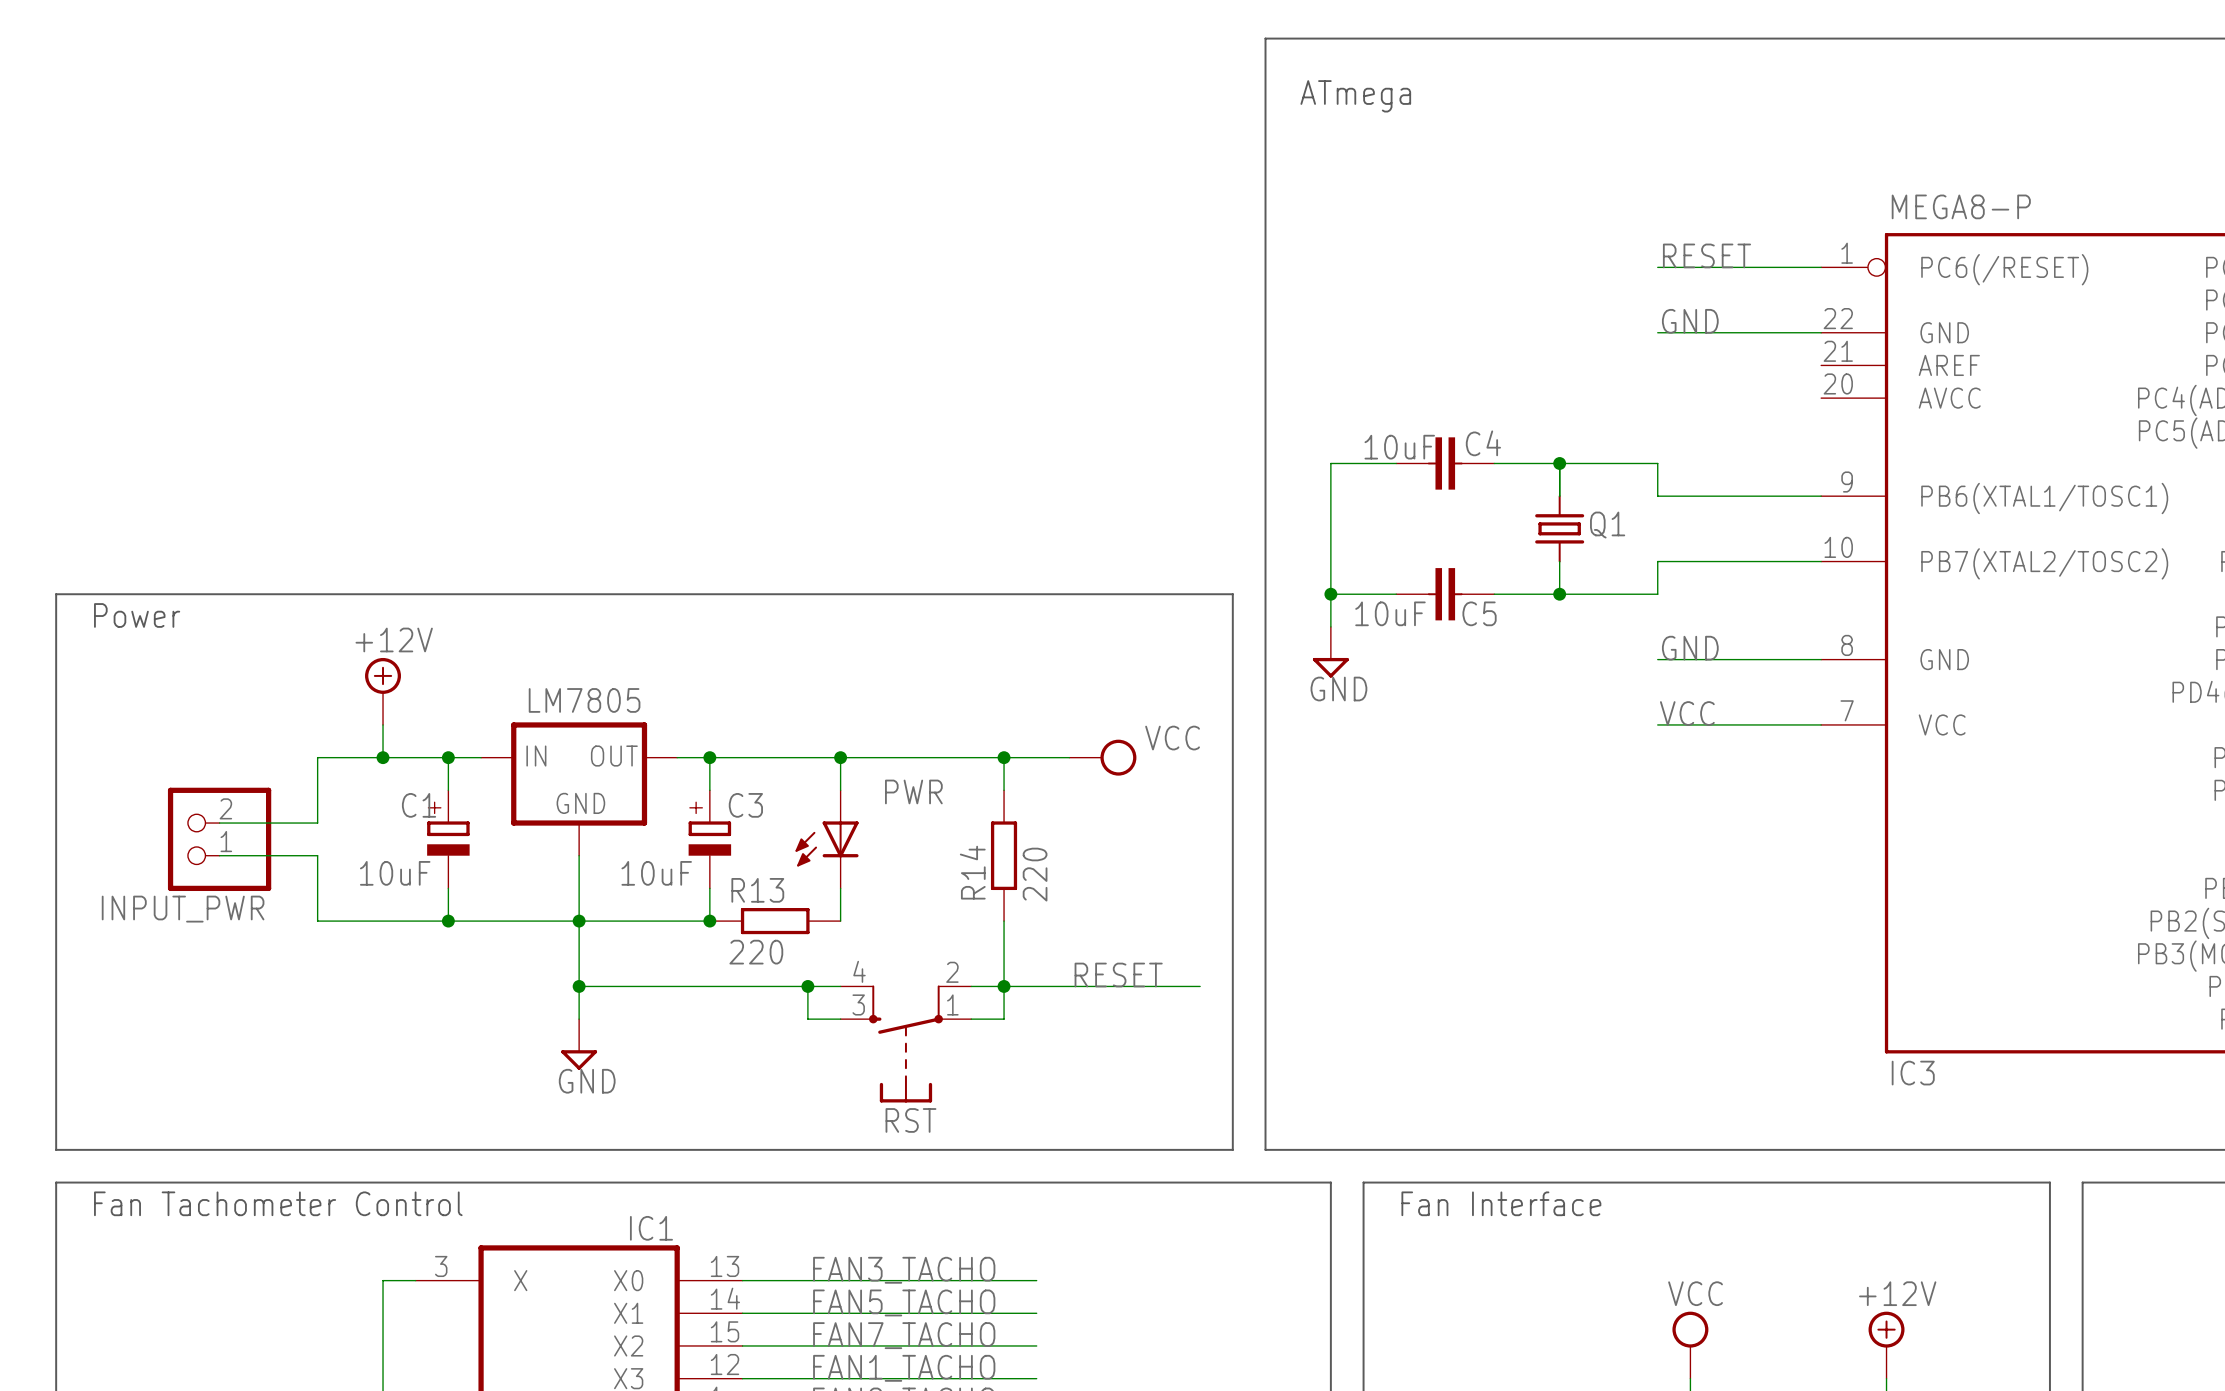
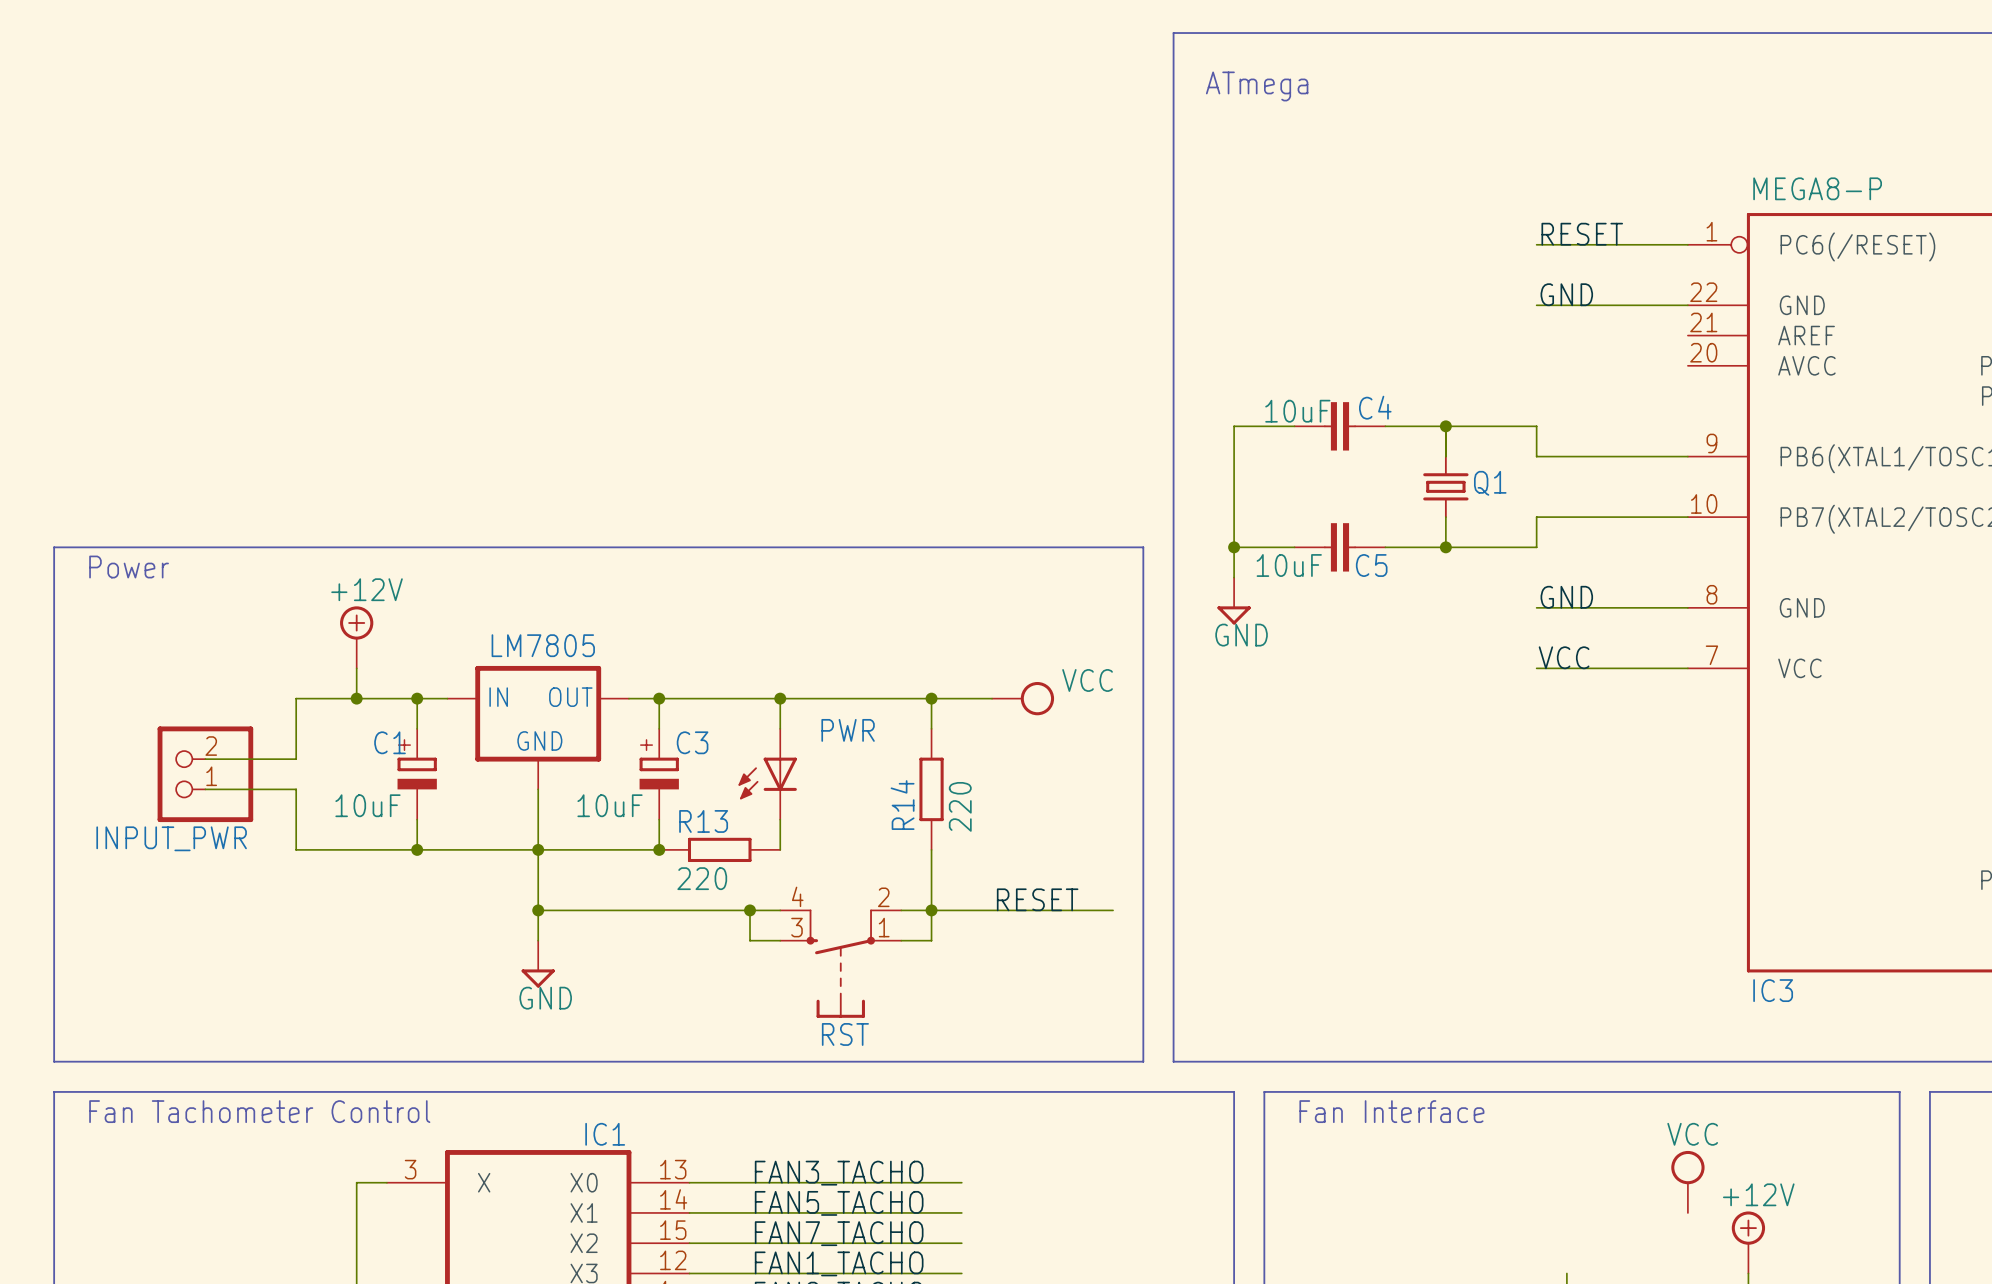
power symbol position: VCC (1690, 1345) -> VCC (1687, 1181)

